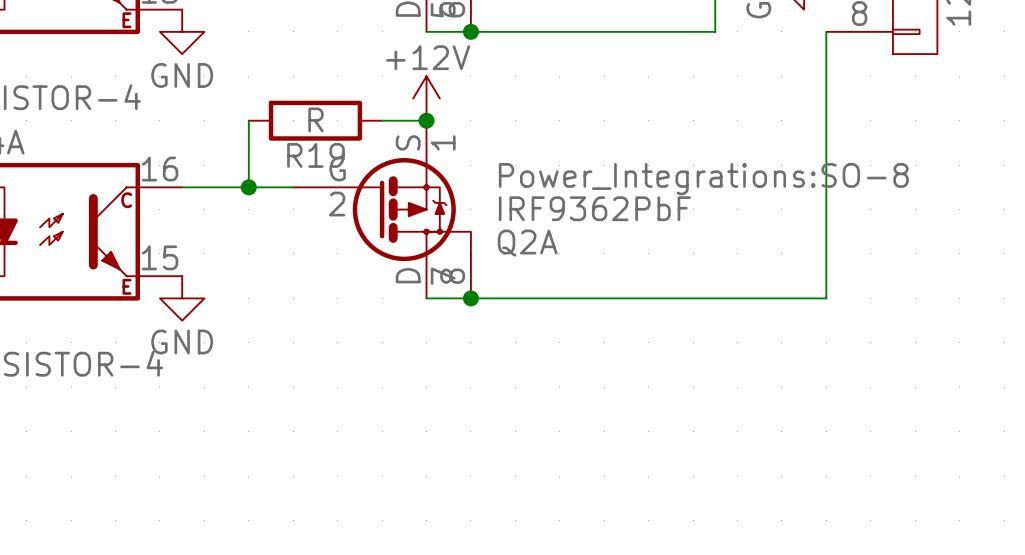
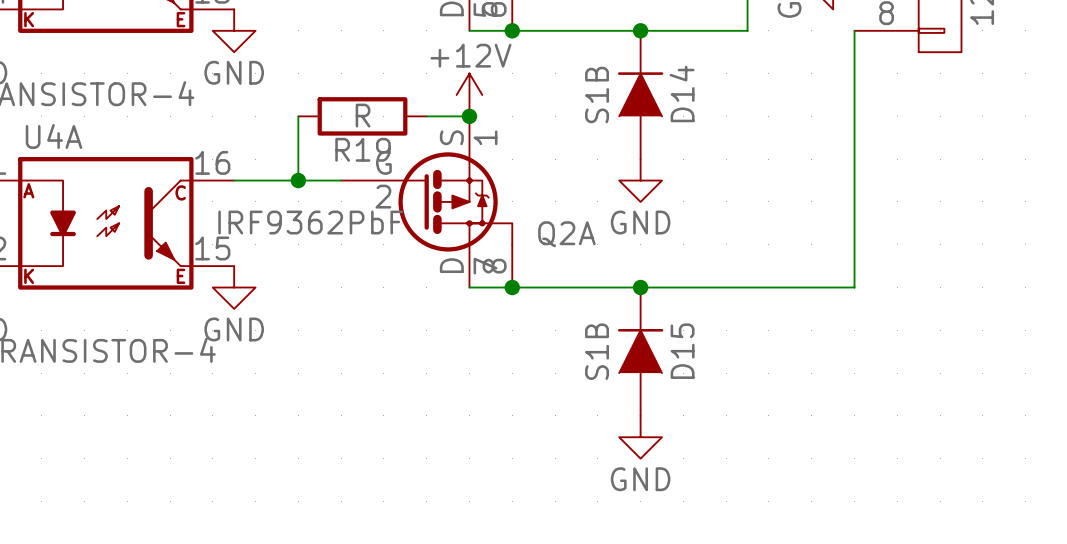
junction: none -> (640, 30)
D14: none -> S1B (640, 94)
Q2A text: Power_Integrations:SO-8 (703, 179) -> none
power symbol: none -> GND (640, 180)
Q2A value position: IRF9362PbF (594, 208) -> IRF9362PbF (310, 222)
junction: none -> (640, 287)
D15: none -> S1B (640, 351)
power symbol: none -> GND (640, 437)

